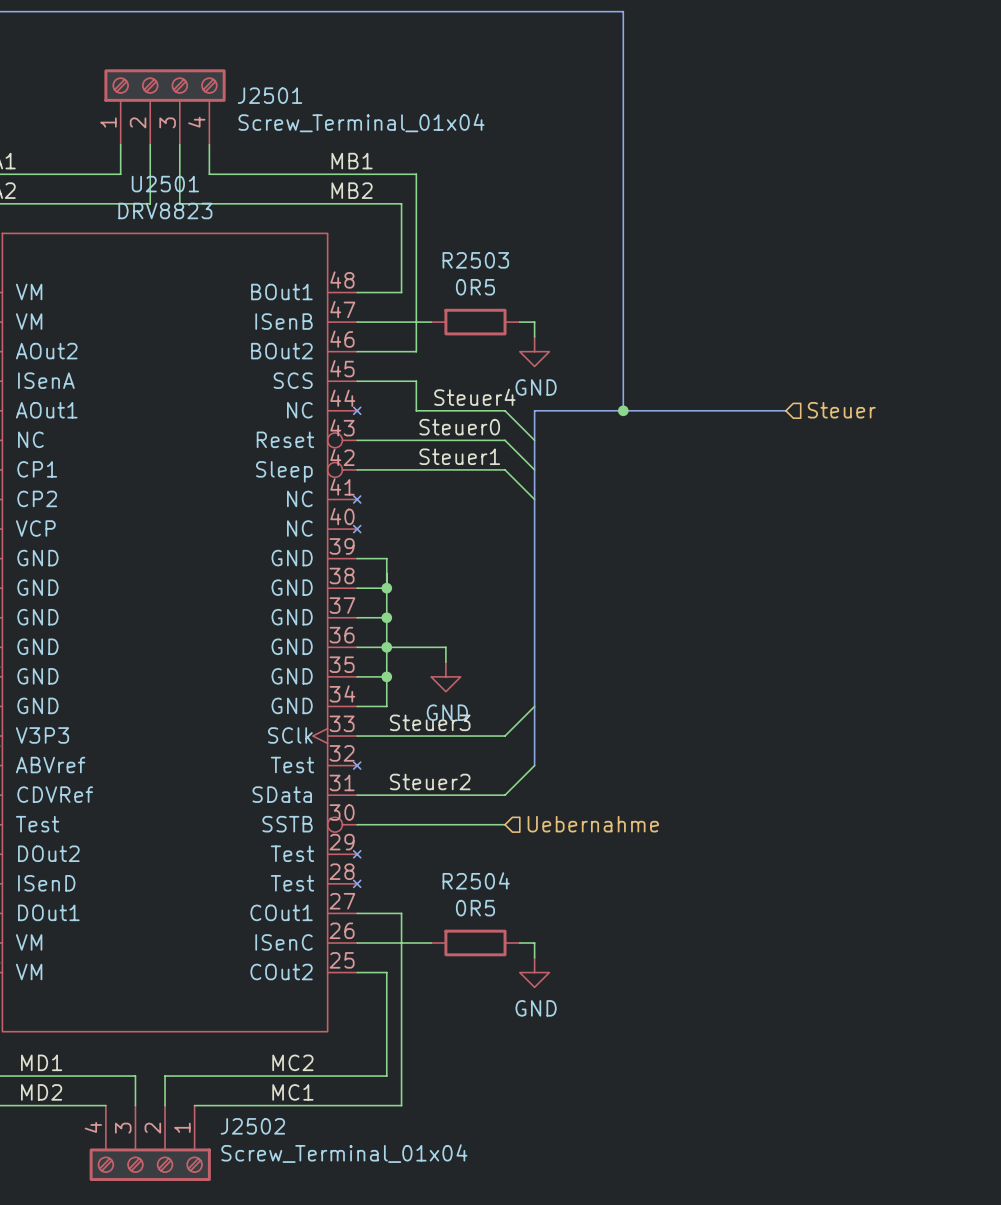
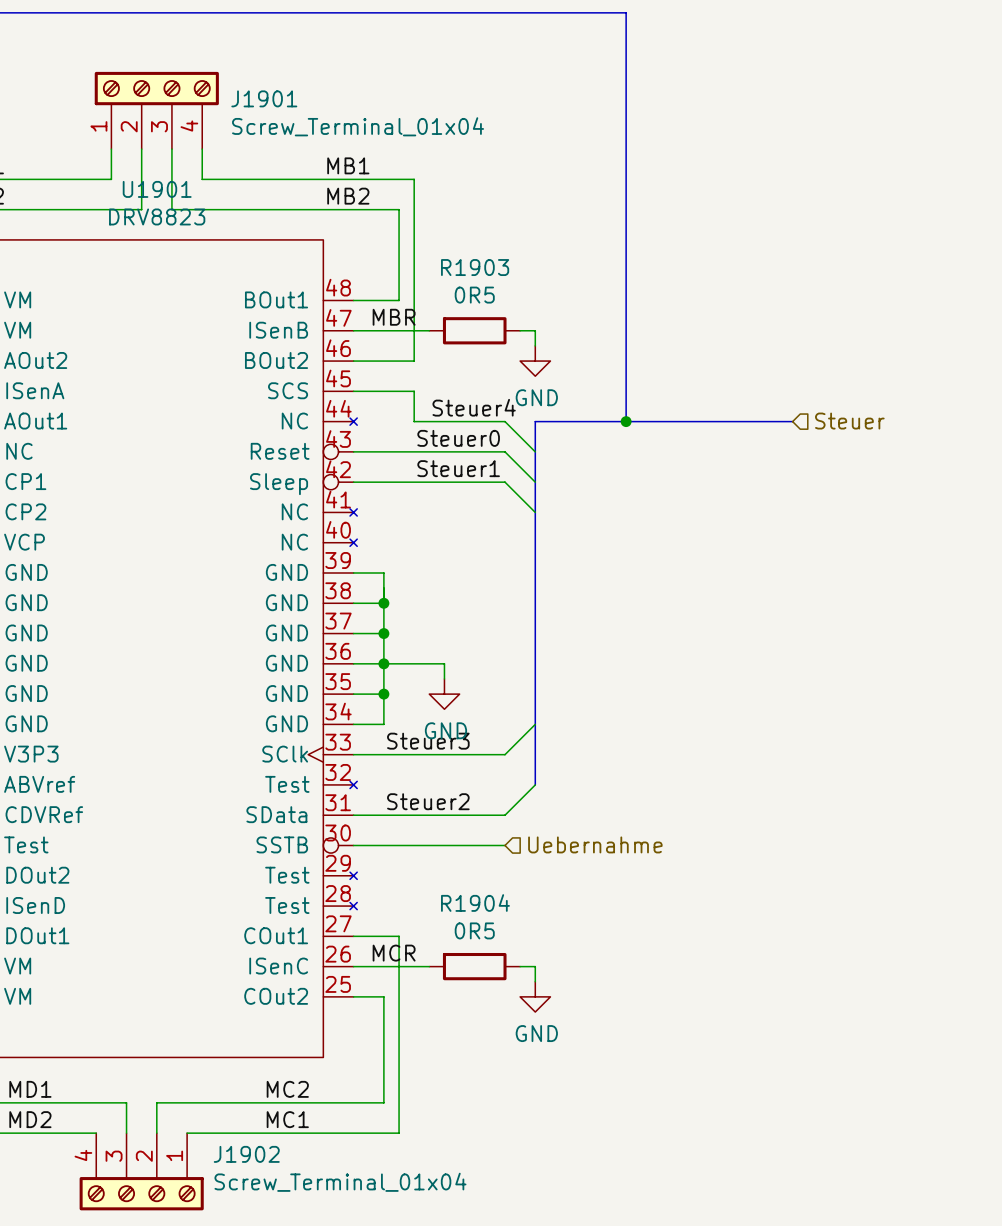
J2501 name: J2501 (270, 95) -> J1901 (264, 98)
U2501 name: U2501 (165, 184) -> U1901 (157, 189)
R2503 name: R2503 (475, 260) -> R1903 (475, 267)
label: none -> MBR (394, 317)
R2504 name: R2504 (476, 880) -> R1904 (475, 903)
label: none -> MCR (394, 953)
J2502 name: J2502 (252, 1126) -> J1902 (246, 1154)

